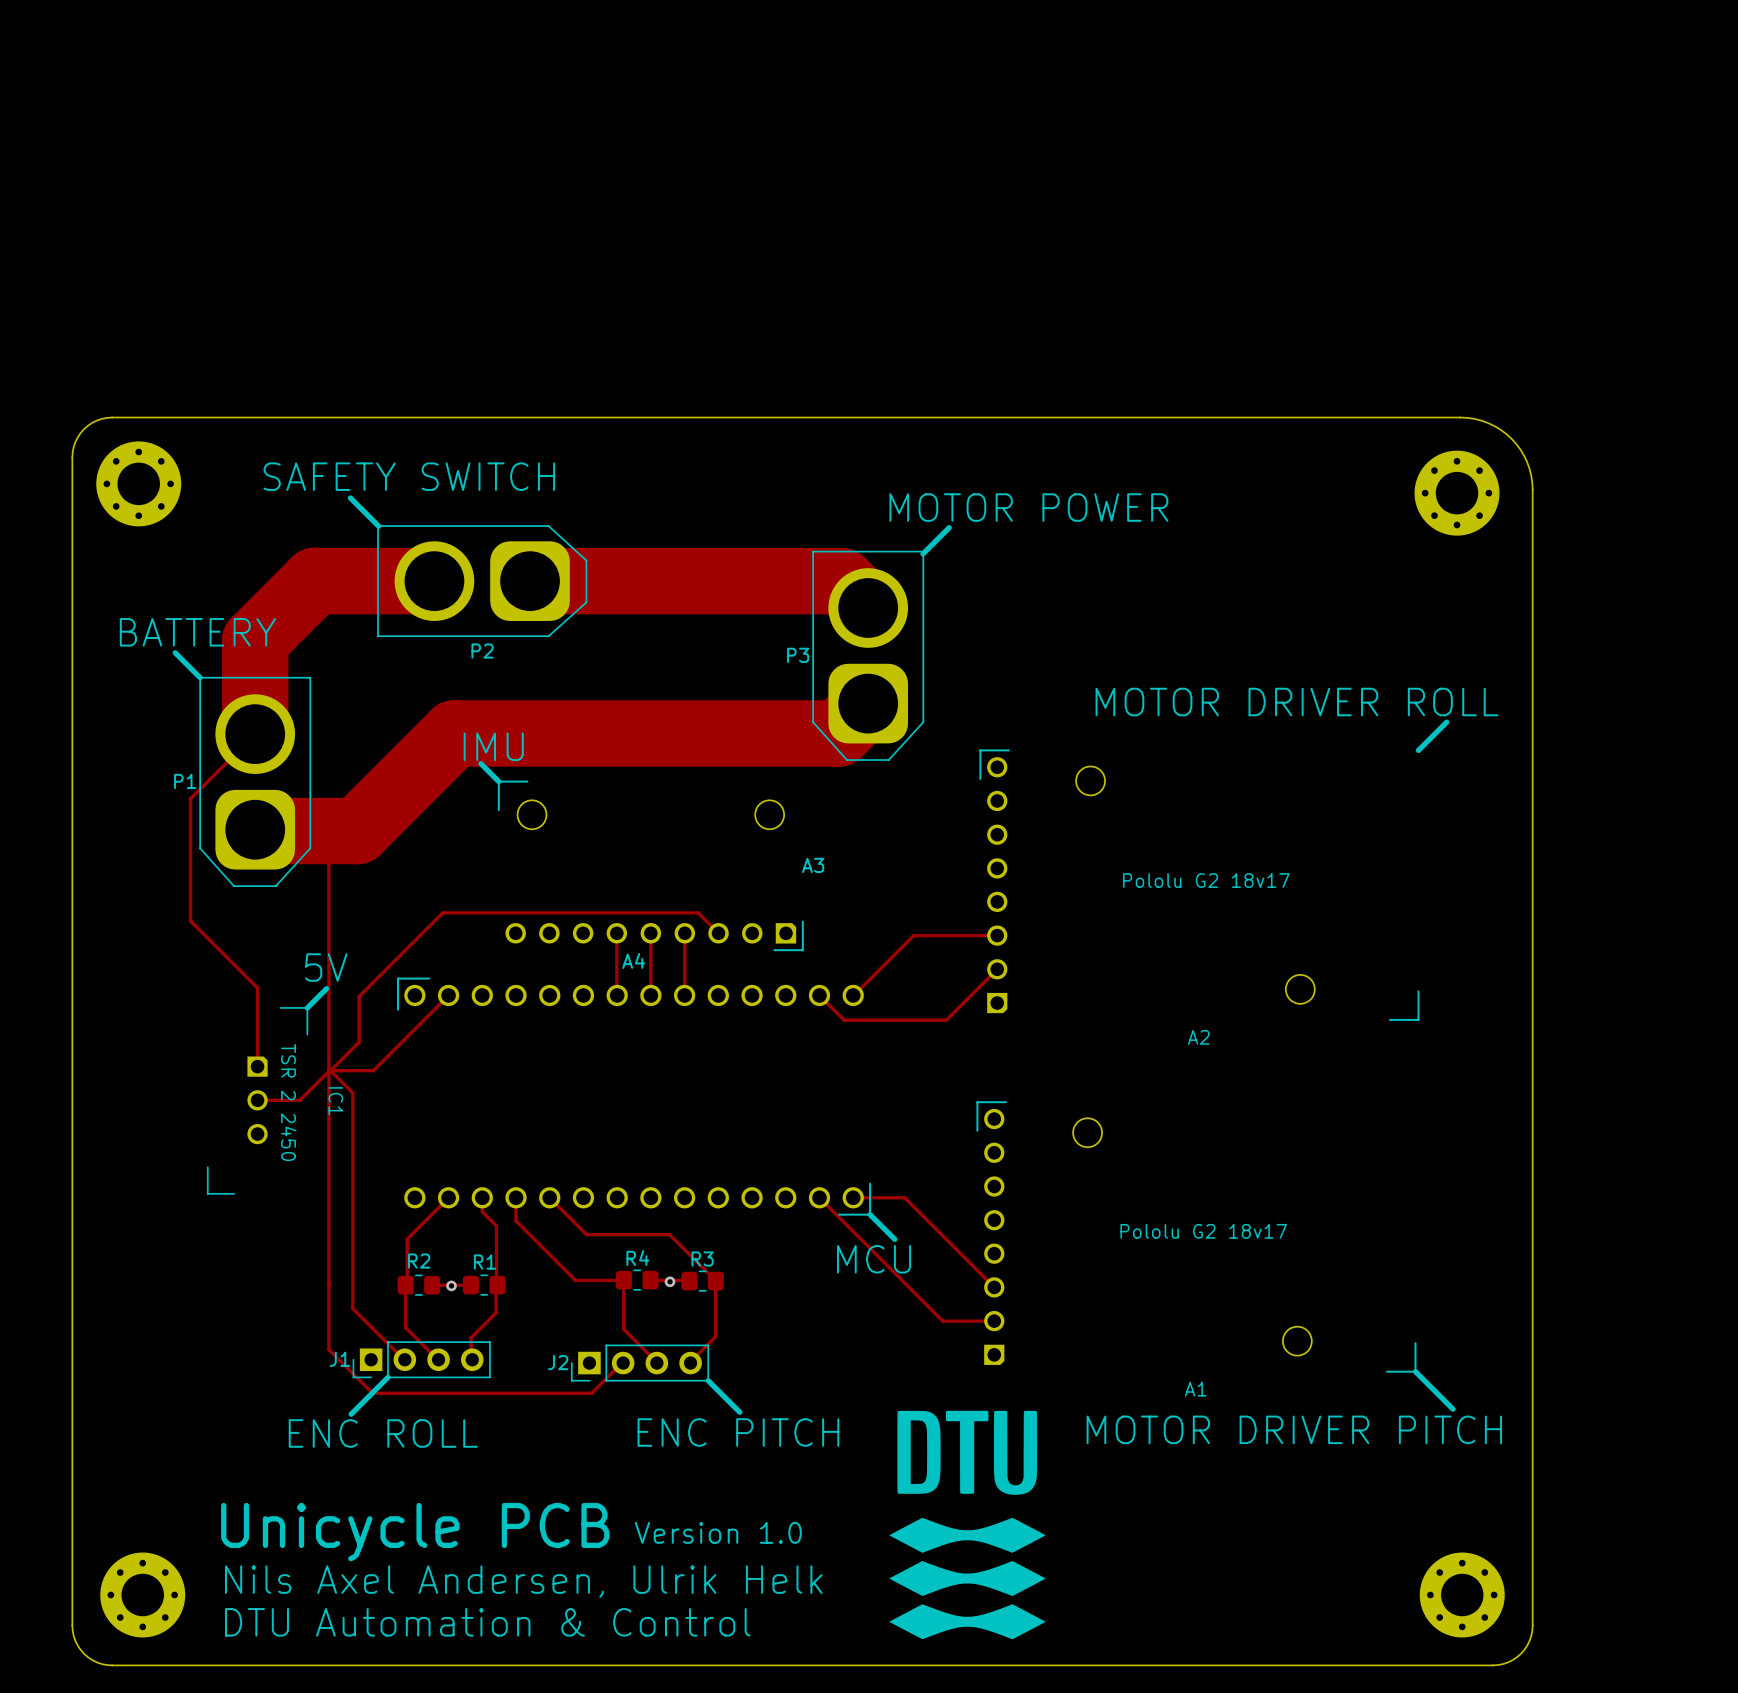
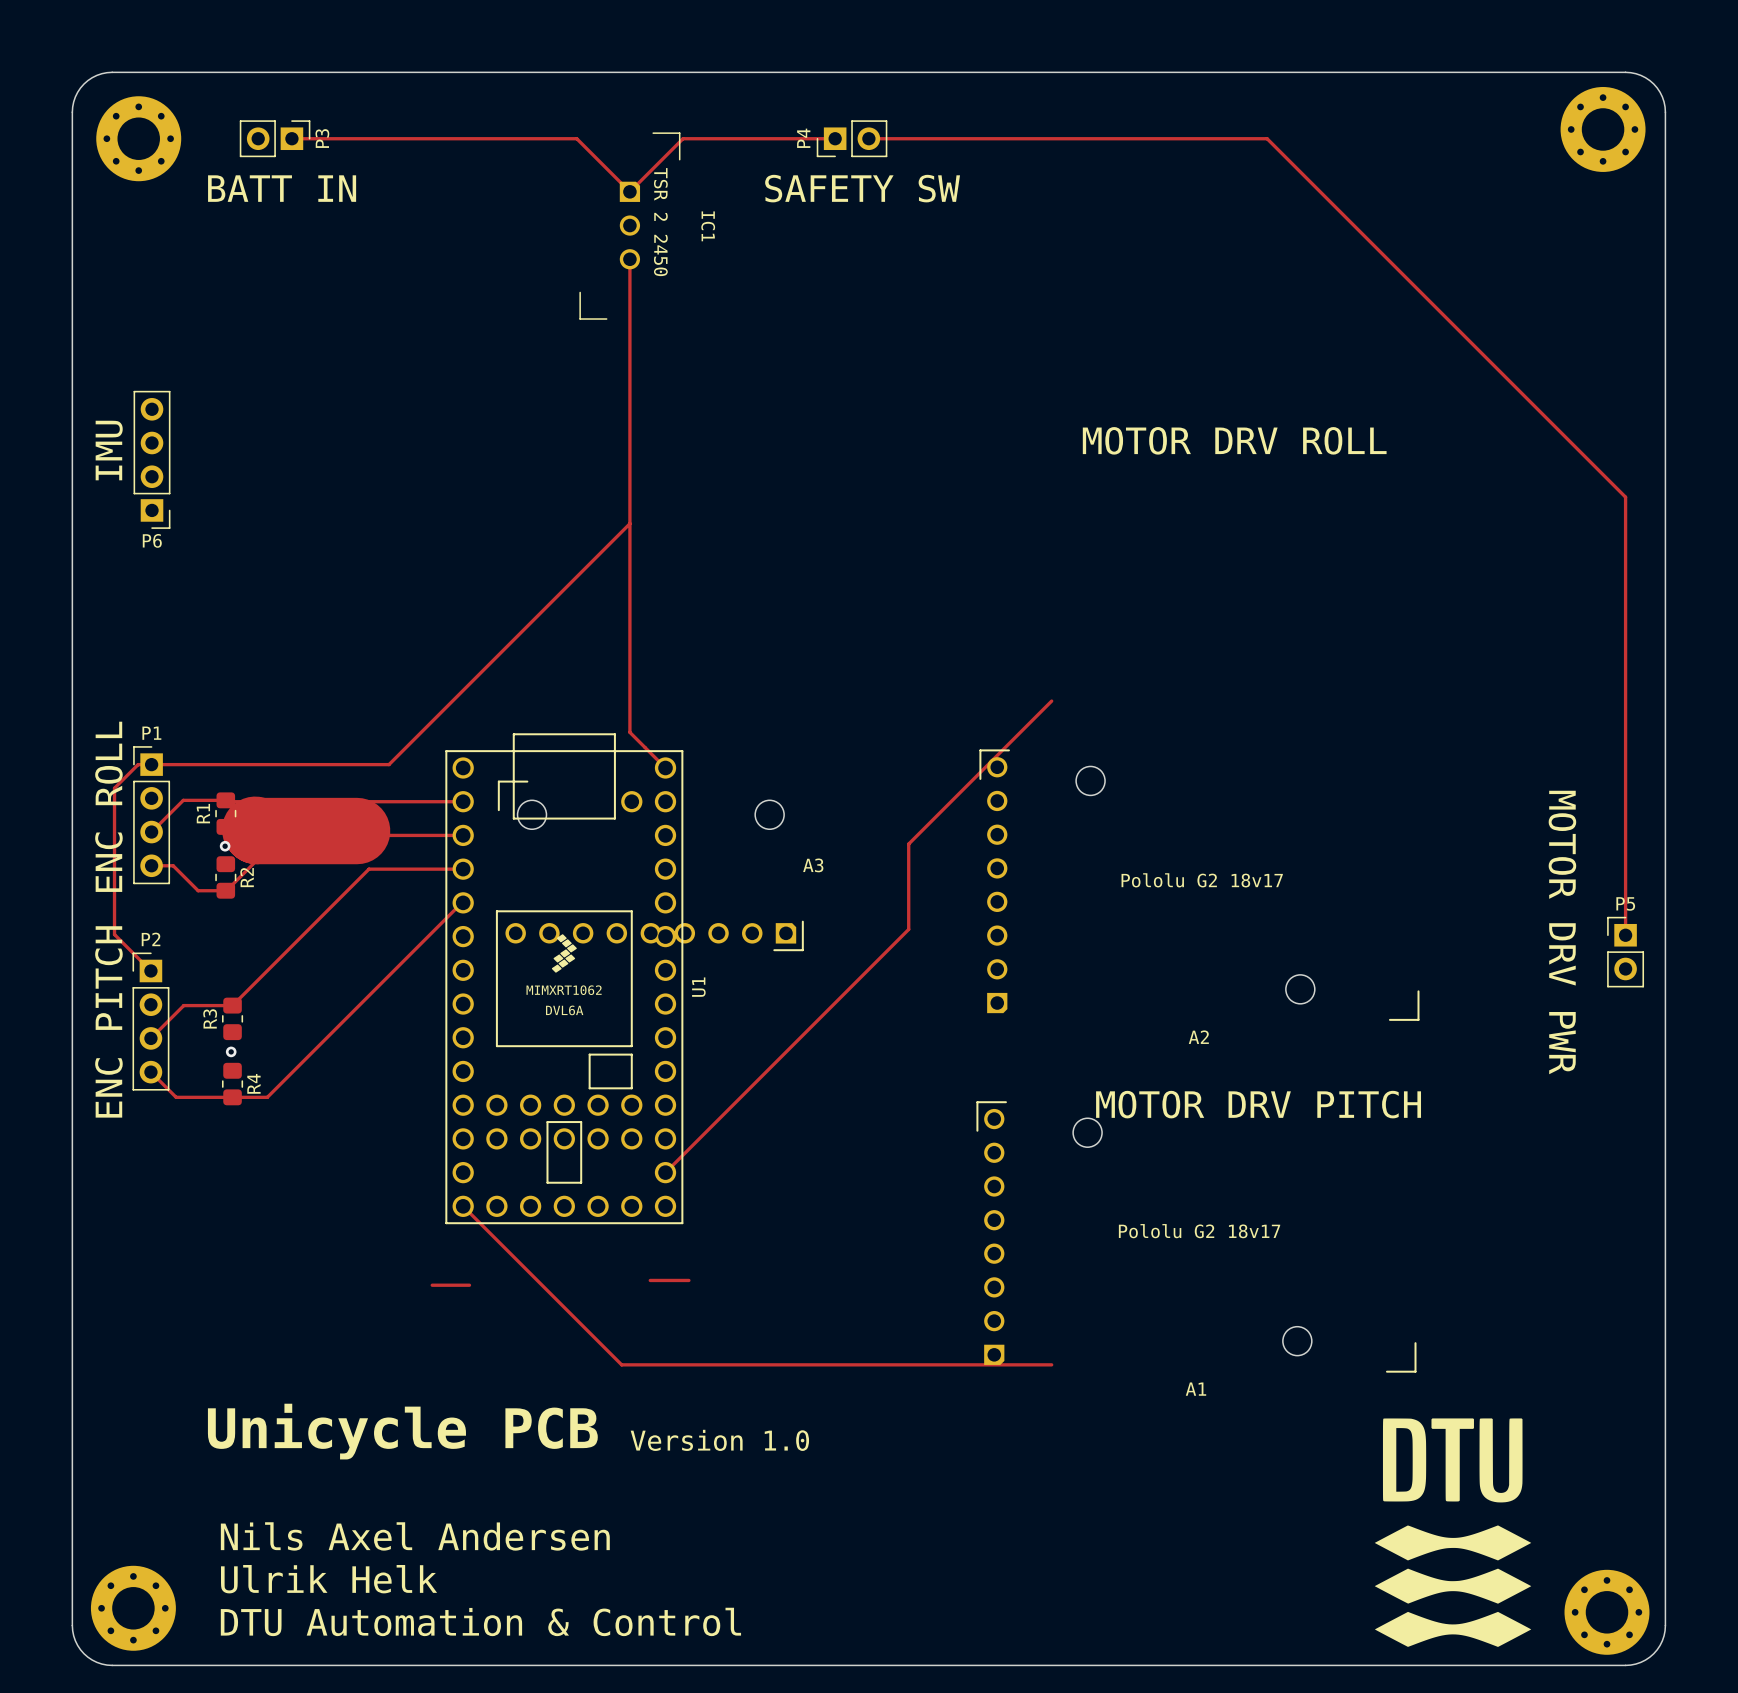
part: none -> (1603, 129)
part: none -> (138, 138)
track: none -> (291, 138) (576, 138) (629, 191) (683, 138) (835, 138)
P4: none -> (852, 138)
track: none -> (868, 138) (1267, 138) (1625, 497) (1625, 935)
text: none -> BATT IN (282, 188)
text: none -> SAFETY SW (862, 188)
track: none -> (629, 259) (629, 732) (665, 767)
text: none -> MOTOR DRV ROLL (1234, 440)
text: none -> IMU (109, 450)
board edge: (72, 457) (75, 442) (84, 429) (96, 420) (112, 417) (1460, 417) (1481, 420) (1506, 433) (1516, 443) (1527, 462) (1532, 489) (1532, 1625) (1529, 1640) (1520, 1653) (1508, 1662) (1492, 1665) -> (72, 457) (72, 106) (75, 96) (84, 84) (101, 73) (1625, 72) (1640, 75) (1649, 80) (1662, 96) (1665, 112) (1665, 1630) (1657, 1649) (1645, 1660) (1635, 1664) (1492, 1665)
P6: none -> (152, 459)
text: SAFETY SWITCH (409, 476) -> none
part: (138, 483) -> none
part: (1457, 493) -> none
line: (350, 497) (378, 526) -> none
text: MOTOR POWER (1028, 507) -> none
track: none -> (629, 523) (389, 764) (138, 764) (114, 788) (114, 934) (150, 970)
P2 footprint: [377, 525, 588, 638] -> [132, 952, 170, 1091]
line: (949, 527) (922, 553) -> none
P3 footprint: [812, 550, 925, 761] -> [239, 120, 311, 158]
track: (434, 581) (315, 580) (255, 640) (255, 734) (190, 798) (190, 920) (257, 988) (257, 1066) -> none
track: (530, 581) (841, 581) (868, 608) -> none
text: BATTERY (197, 632) -> none
P2 name position: P2 (482, 651) -> P2 (151, 939)
line: (175, 652) (200, 677) -> none
P3 name position: P3 (798, 655) -> P3 (322, 138)
P1 footprint: [199, 676, 312, 887] -> [133, 746, 171, 885]
track: none -> (1051, 701) (908, 844) (908, 929) (665, 1172)
text: MOTOR DRIVER ROLL (1296, 702) -> none
track: (868, 703) (838, 733) (454, 733) (328, 859) (328, 1349) (372, 1393) (591, 1393) (622, 1362) -> none
line: (1446, 722) (1418, 750) -> none
text: IMU (493, 746) -> none
line: (480, 763) (498, 781) -> none
P1 name position: P1 (185, 781) -> P1 (151, 733)
text: none -> ENC ROLL (108, 806)
track: none -> (463, 801) (183, 800) (151, 832)
track: none -> (463, 835) (281, 835) (226, 890) (198, 890) (173, 865) (151, 865)
via: none -> (225, 846)
track: none -> (463, 869) (368, 869) (232, 1005) (183, 1005) (150, 1038)
track: none -> (463, 902) (267, 1097) (176, 1097) (150, 1072)
track: (616, 933) (617, 995) -> none
track: (650, 933) (650, 995) -> none
track: (684, 933) (684, 995) -> none
track: (718, 933) (698, 912) (442, 912) (359, 996) (359, 1042) (330, 1070) (373, 1070) (448, 995) -> none
track: (997, 935) (913, 935) (853, 995) -> none
P5: none -> (1625, 952)
text: none -> MOTOR DRV PWR (1562, 932)
text: 5V (326, 967) -> none
track: (997, 969) (946, 1020) (844, 1020) (819, 995) -> none
U1: none -> (564, 978)
line: (326, 988) (307, 1007) -> none
text: none -> ENC PITCH (108, 1021)
via: none -> (231, 1051)
track: (328, 1069) (352, 1092) (352, 1308) (403, 1359) -> none
track: (328, 1071) (299, 1100) (257, 1100) -> none
A4: (634, 1096) -> none
IC1 position: (257, 1100) -> (629, 226)
text: none -> MOTOR DRV PITCH (1258, 1104)
track: (448, 1197) (407, 1239) (405, 1327) (437, 1359) -> none
track: (482, 1197) (482, 1211) (496, 1225) (496, 1285) -> none
track: (516, 1197) (516, 1220) (575, 1280) (623, 1280) (623, 1329) (656, 1362) -> none
track: (549, 1197) (586, 1234) (669, 1234) (715, 1280) (715, 1336) (690, 1362) -> none
track: (819, 1197) (942, 1321) (994, 1321) -> none
track: (853, 1197) (904, 1197) (994, 1287) -> none
track: none -> (463, 1206) (621, 1364) (1051, 1364)
line: (870, 1214) (894, 1239) -> none
R3 name position: R3 (702, 1259) -> R3 (210, 1018)
text: MCU (874, 1259) -> none
R1 name position: R1 (484, 1262) -> R1 (203, 813)
R4 rotation: 0° (637, 1280) -> 90° clockwise (232, 1084)
R4 position: (637, 1280) -> (232, 1084)
via: (670, 1281) -> none
R3 rotation: 0° (702, 1281) -> 90° clockwise (232, 1018)
R3 position: (702, 1281) -> (232, 1018)
track: (496, 1284) (496, 1312) (471, 1337) (471, 1359) -> none
R2 rotation: 0° (418, 1285) -> 90° clockwise (225, 877)
R2 position: (418, 1285) -> (225, 877)
via: (451, 1285) -> none
R1 rotation: 0° (484, 1285) -> 90° clockwise (225, 813)
R1 position: (484, 1285) -> (225, 813)
J1: (421, 1359) -> none
J2: (640, 1363) -> none
line: (1415, 1371) (1453, 1409) -> none
line: (387, 1377) (351, 1414) -> none
line: (708, 1380) (739, 1412) -> none
drawing: [889, 1410, 1046, 1640] -> none
drawing: none -> [1374, 1418, 1532, 1647]
text: MOTOR DRIVER PITCH (1294, 1429) -> none
text: ENC PITCH (738, 1432) -> none
text: ENC ROLL (383, 1433) -> none
text position: Unicycle PCB (415, 1532) -> Unicycle PCB (402, 1431)
text position: Version 1.0 (718, 1532) -> Version 1.0 (719, 1440)
text: none -> Nils Axel Andersen (415, 1536)
text: Nils Axel Andersen, Ulrik Helk (523, 1581) -> Ulrik Helk (329, 1579)
part position: (142, 1595) -> (133, 1608)
part position: (1462, 1595) -> (1607, 1612)

